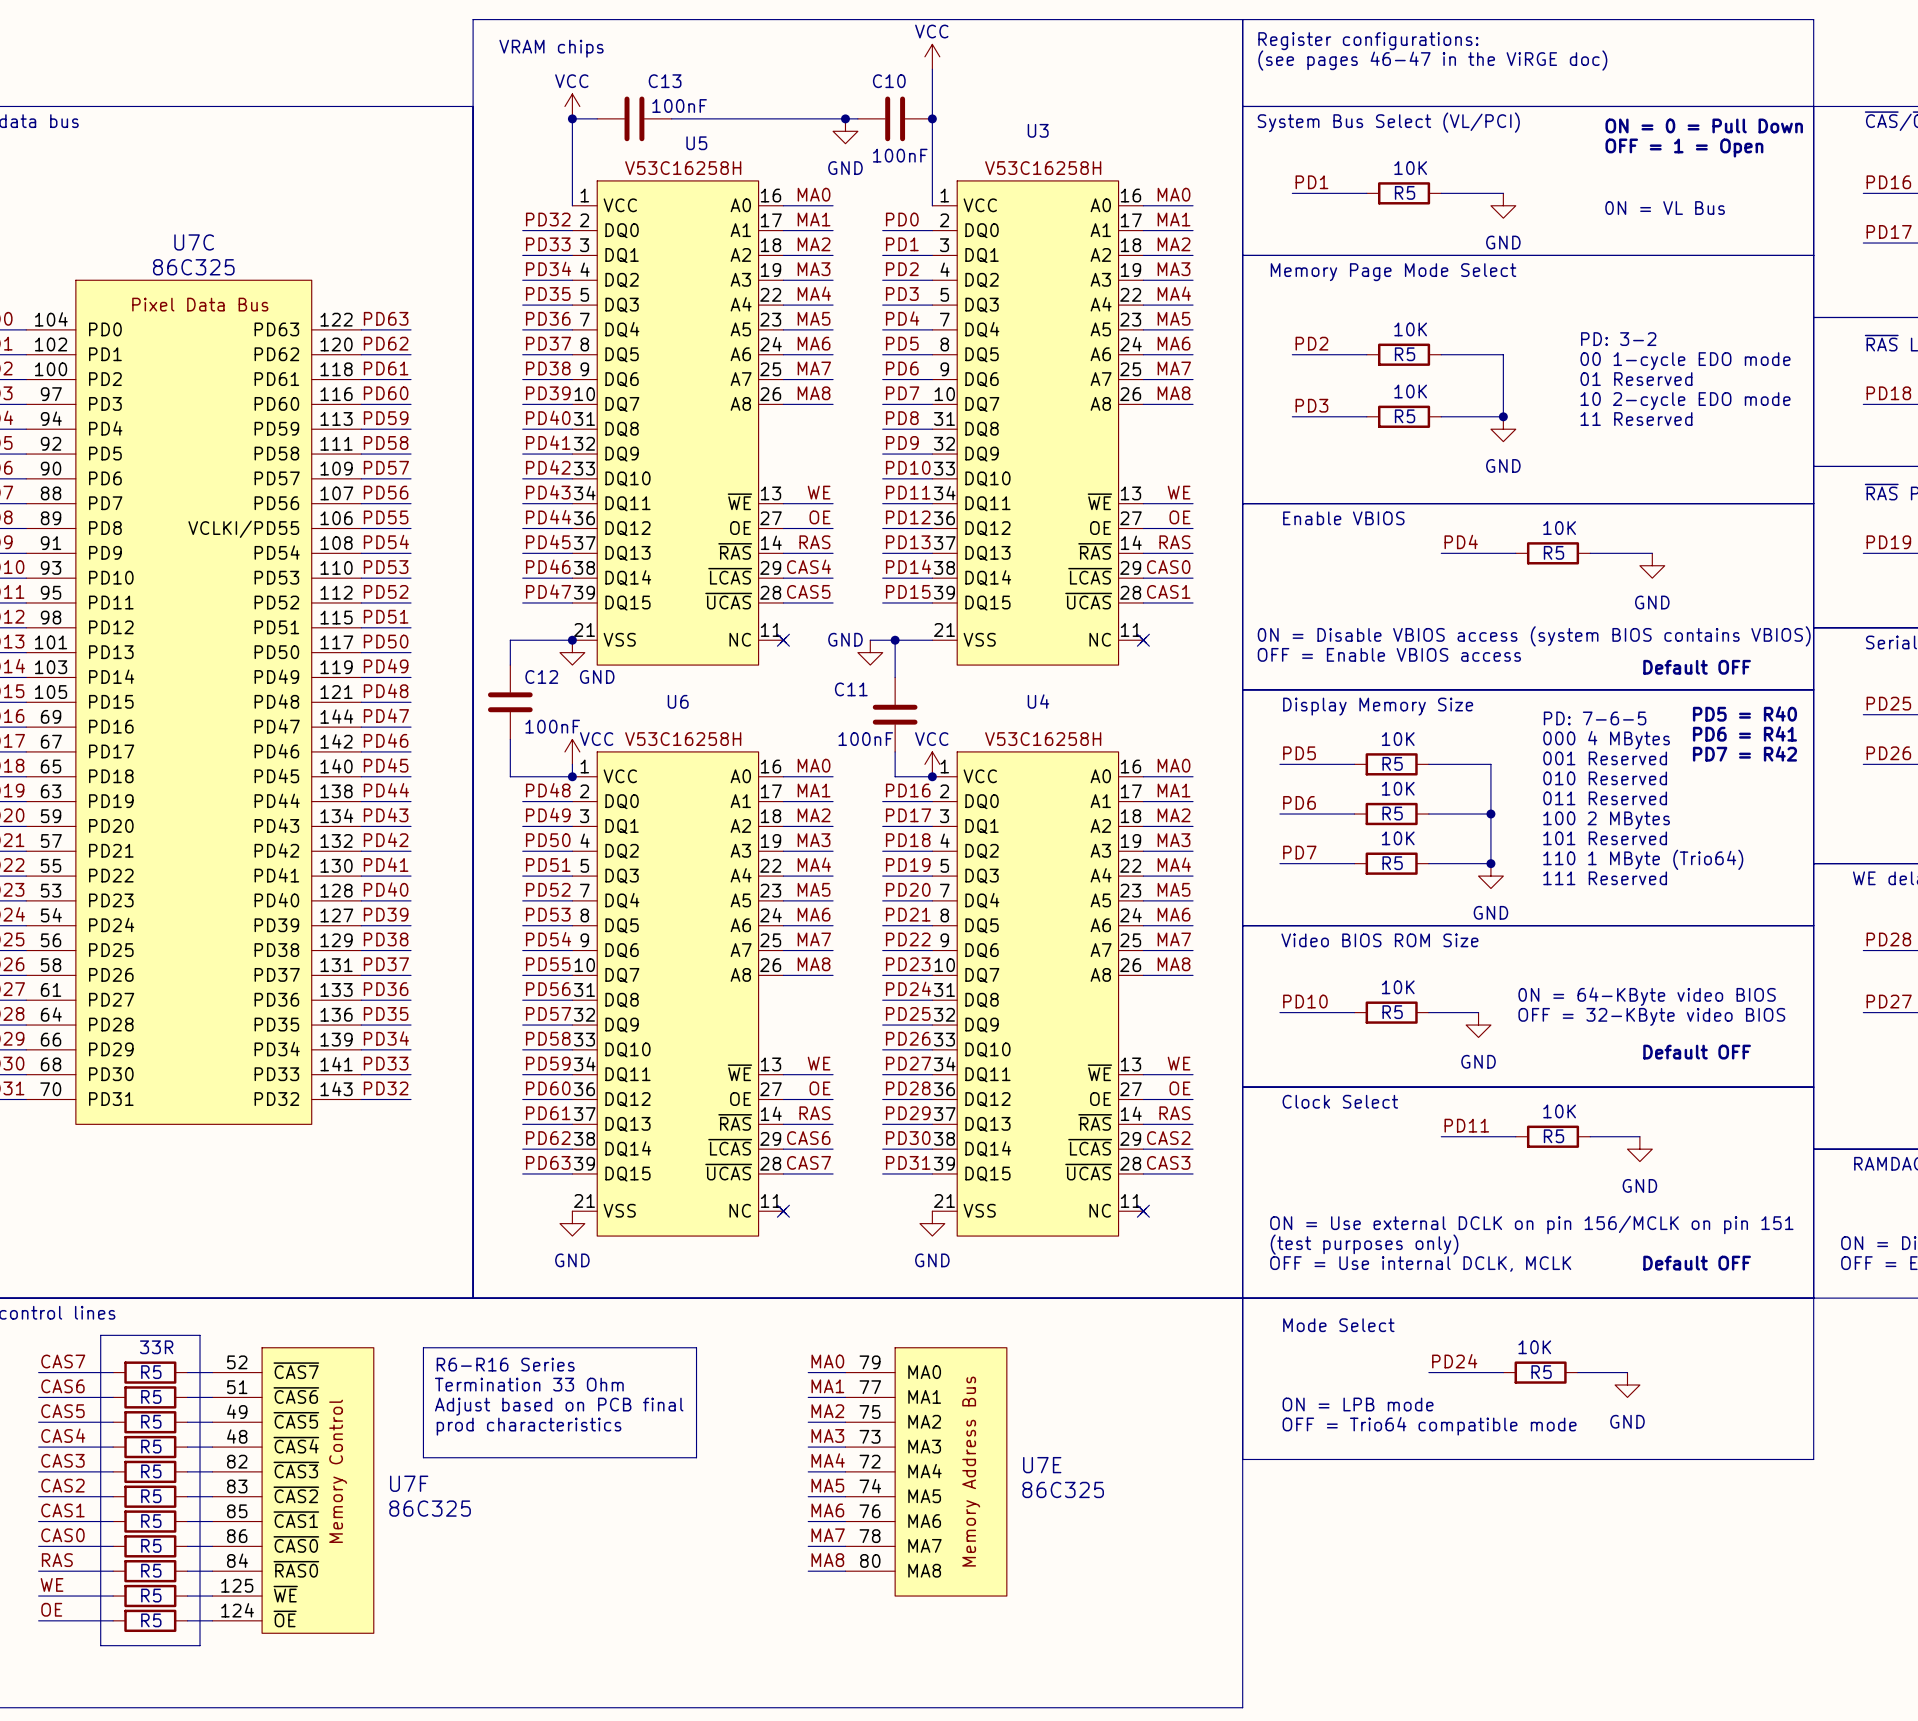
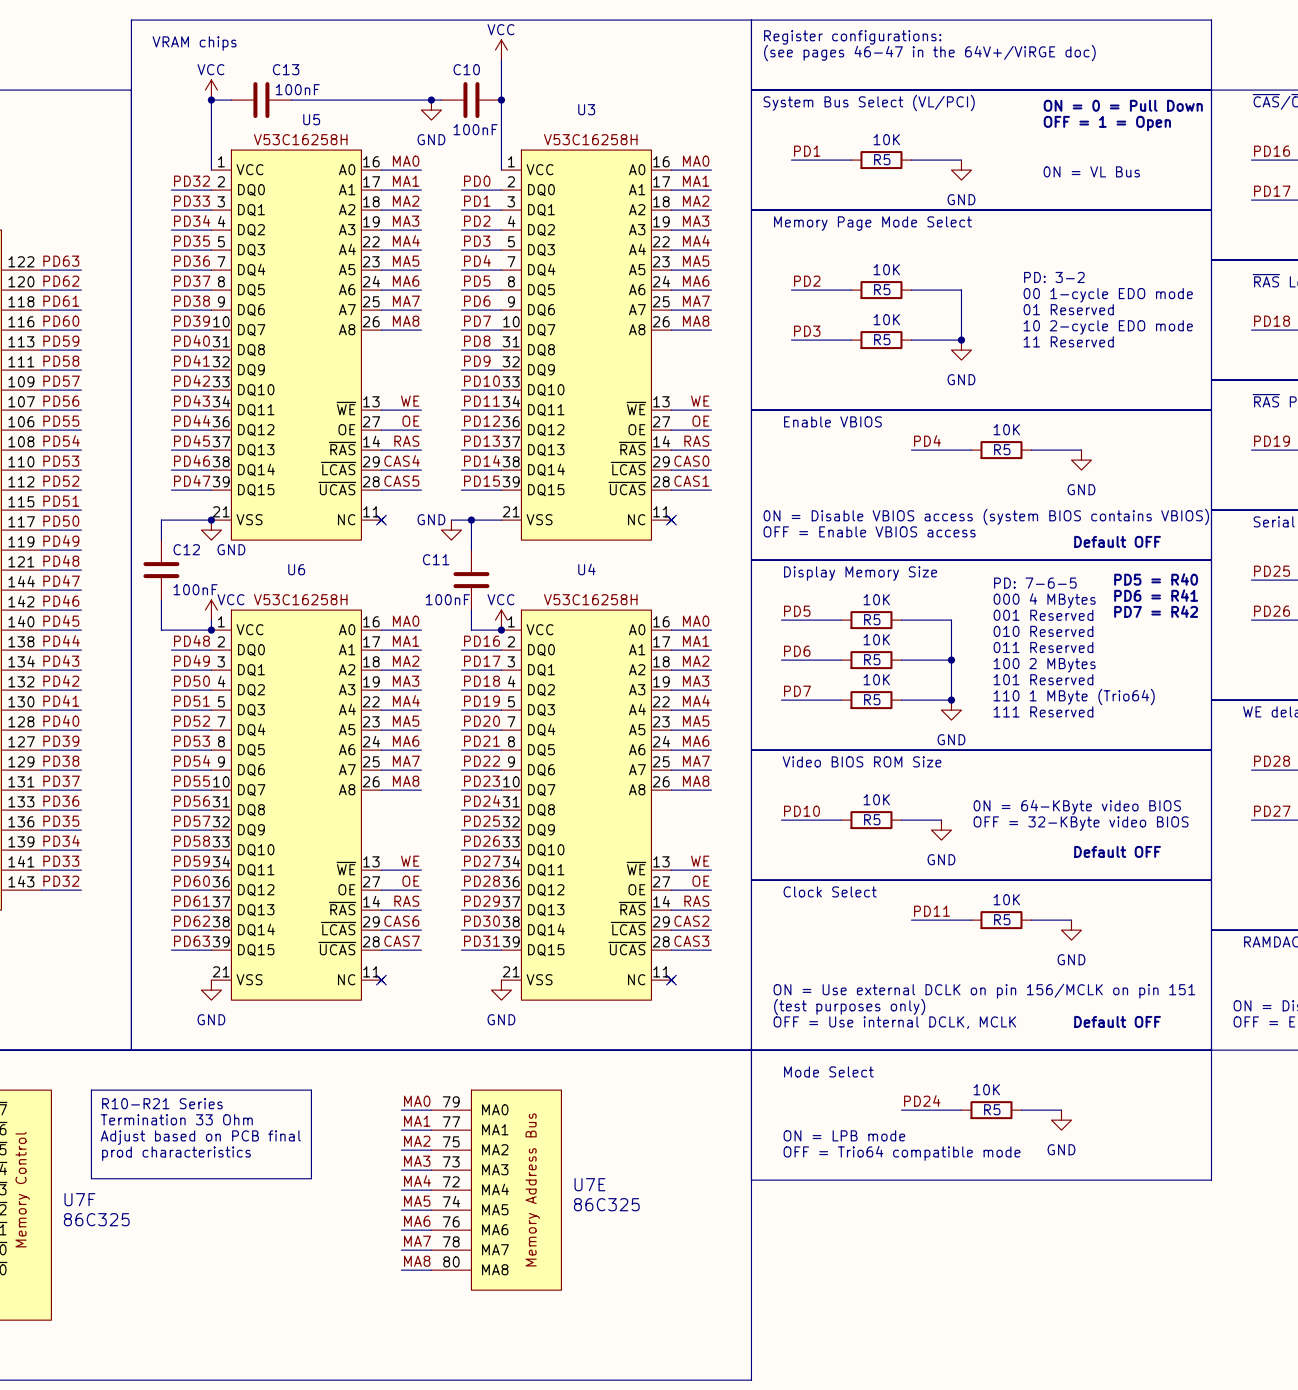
text: (see pages 46-47 in the ViRGE doc) (1432, 60) -> (see pages 46-47 in the 64V+/ViRGE doc) (929, 53)
text: R6-R16 Series (505, 1364) -> R10-R21 Series (162, 1103)

